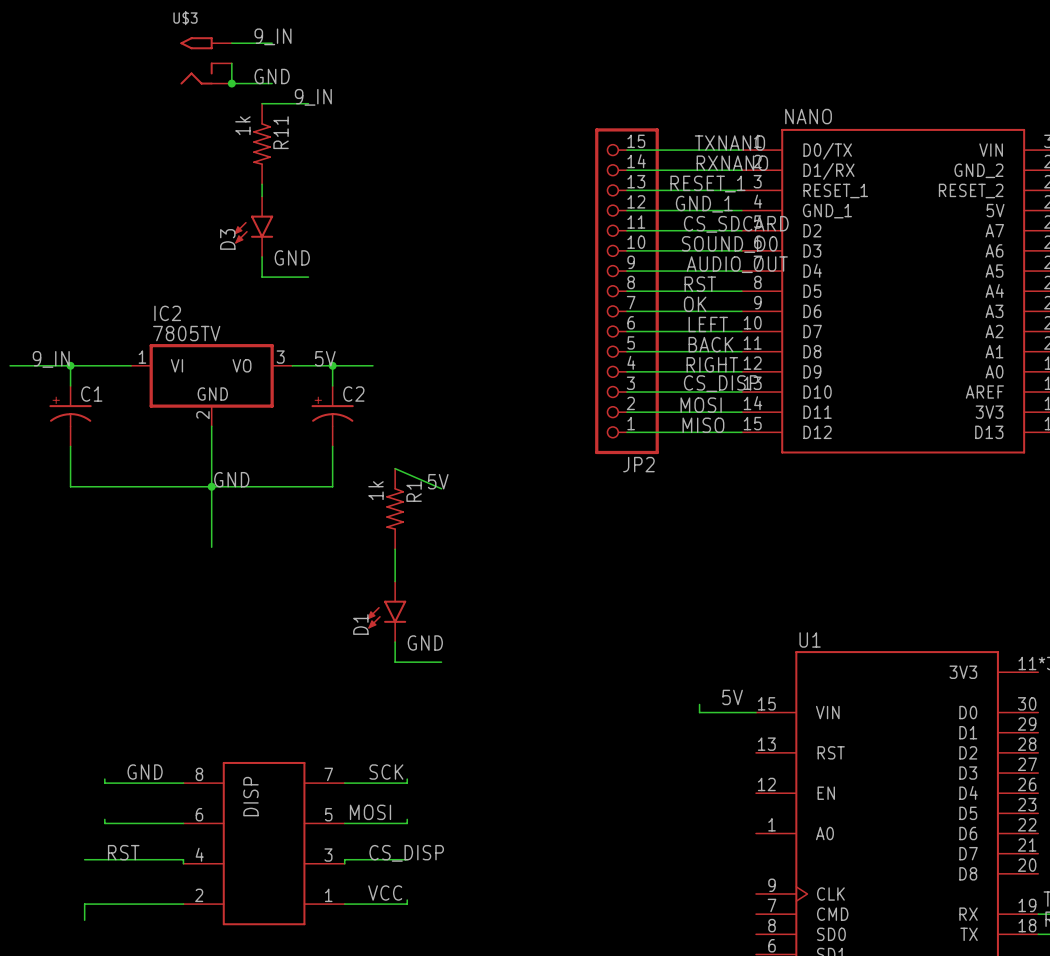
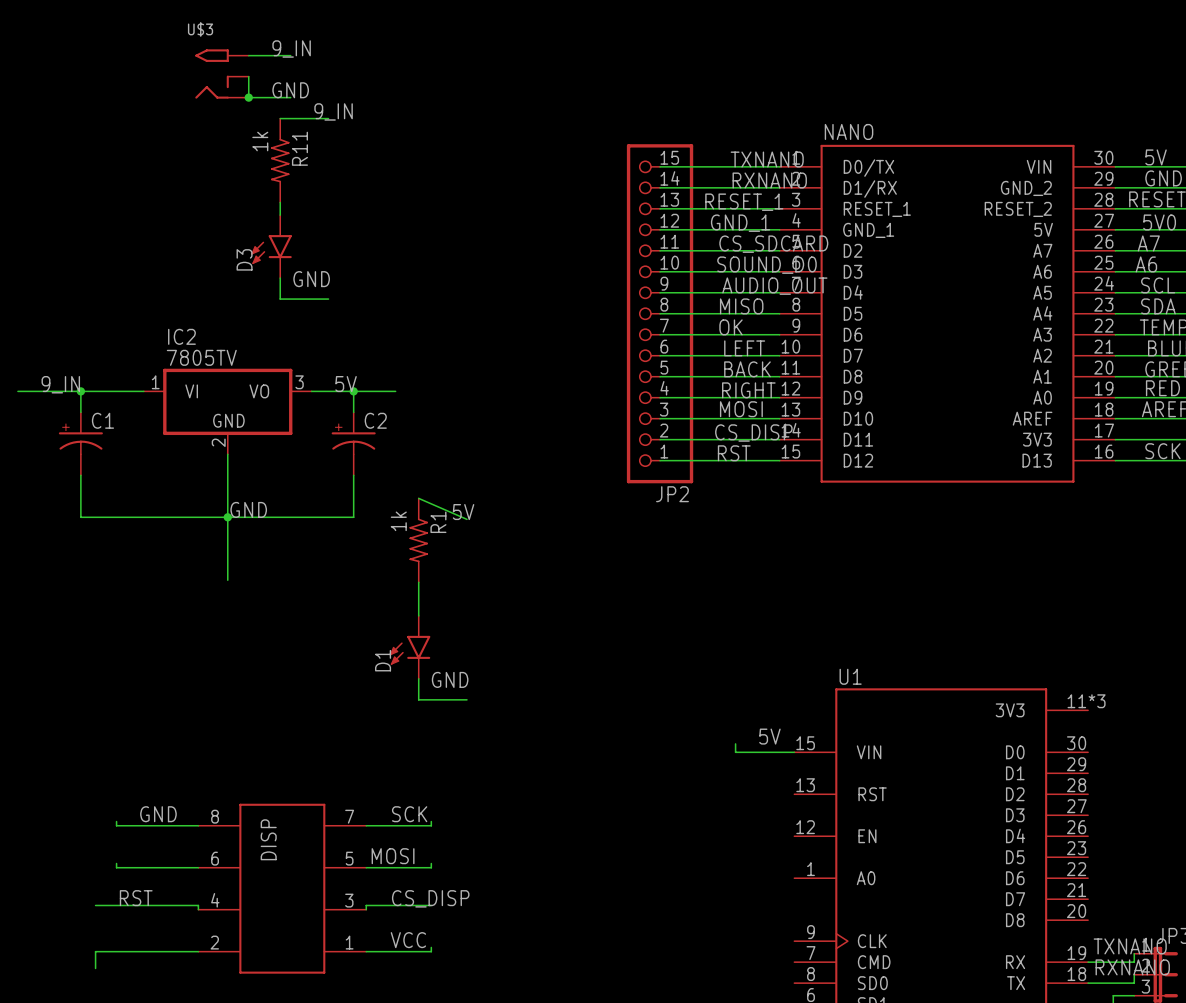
label: RST (700, 284) -> MISO (741, 306)
label: CS_DISP (721, 383) -> MOSI (741, 409)
label: MOSI (701, 405) -> CS_DISP (753, 433)
label: MISO (703, 425) -> RST (734, 453)

